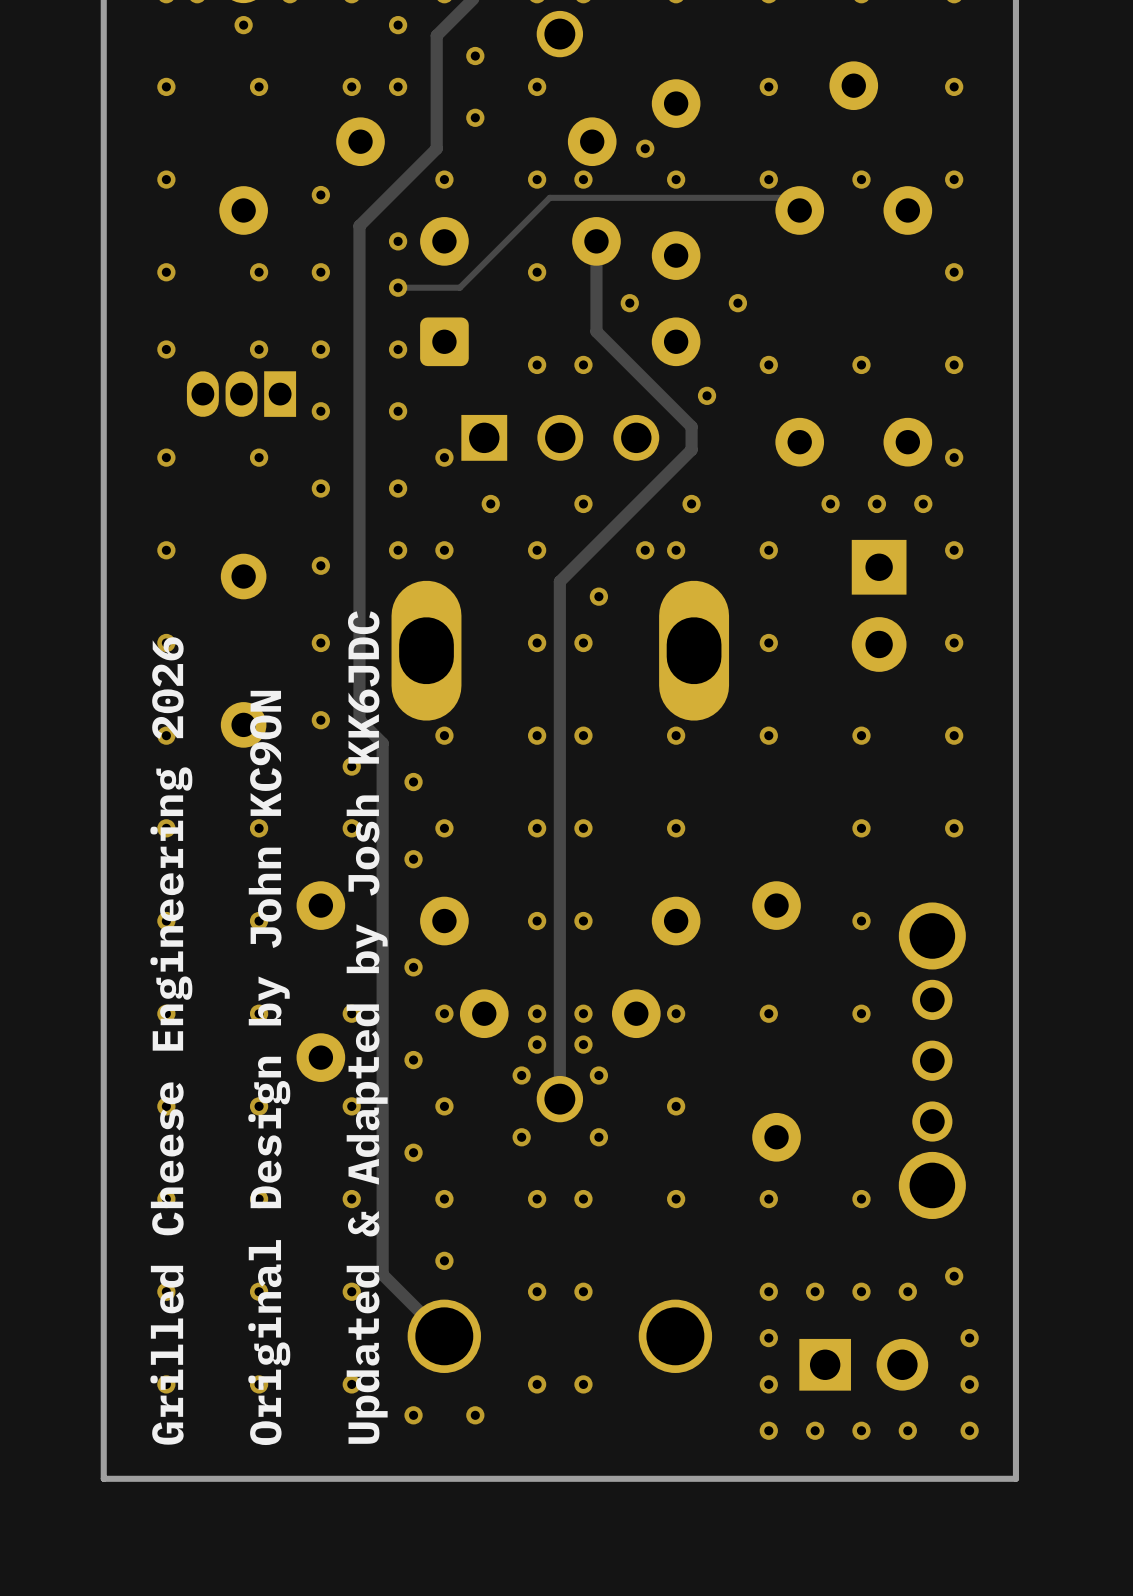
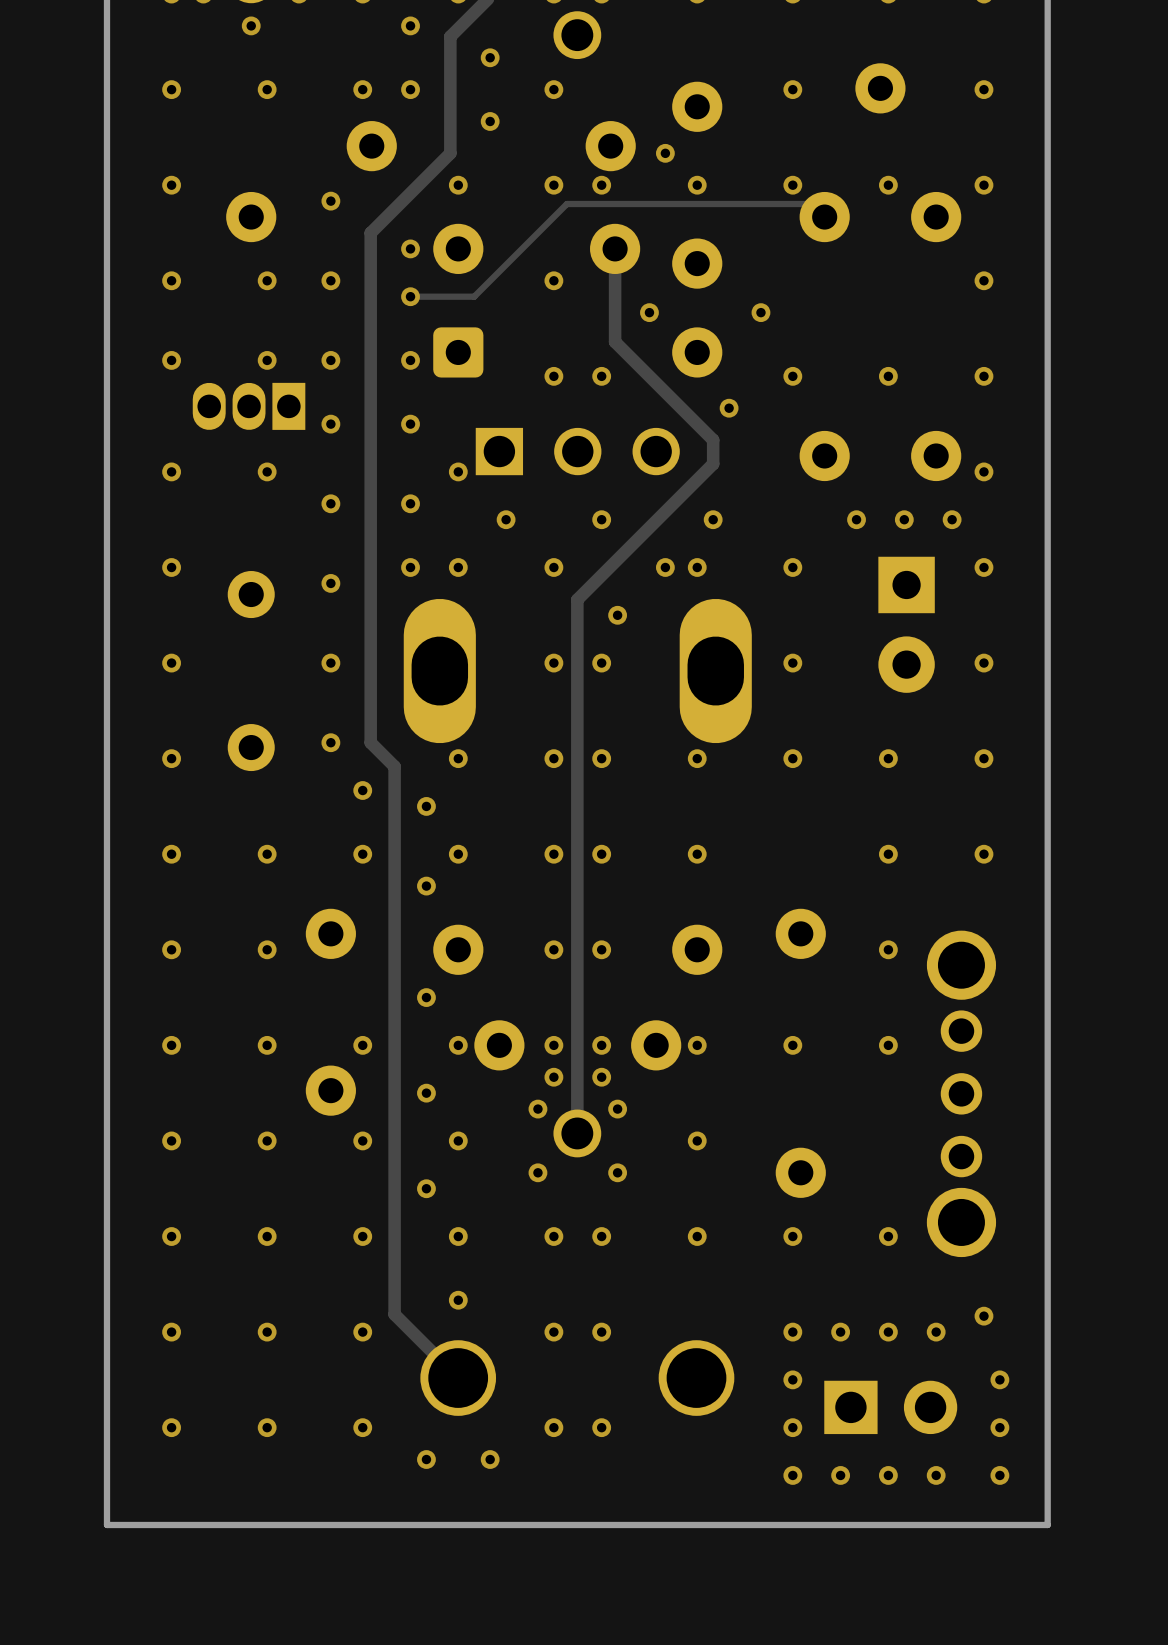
text: Updated & Adapted by Josh KK6JDC (367, 1027) -> none
text: Grilled Cheese Engineering 2026 (171, 1040) -> none
text: Original Design by John KC9ON (269, 1067) -> none

